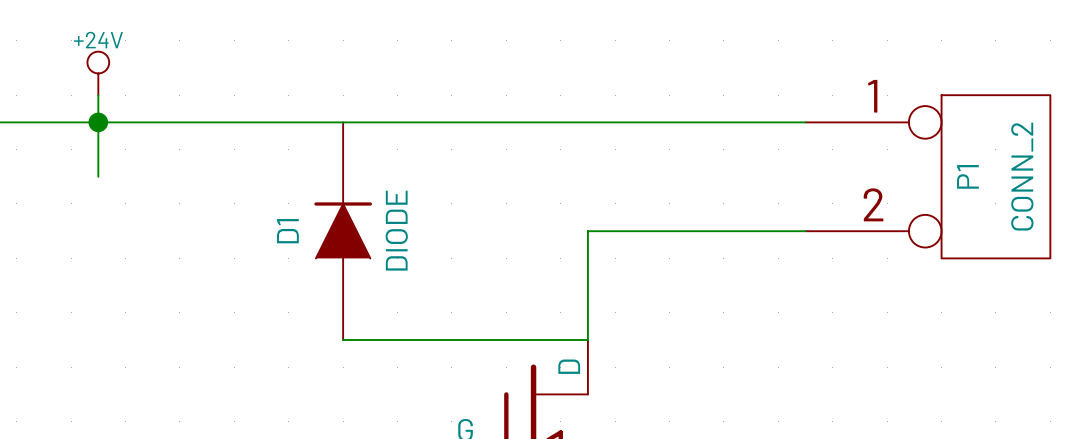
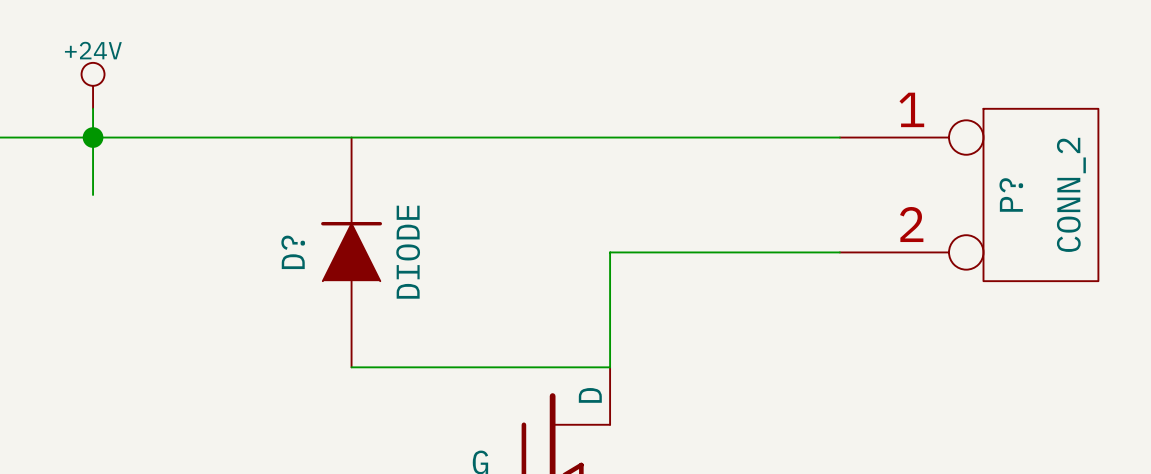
P1 name: P1 (967, 176) -> P? (1011, 194)
D1 name: D1 (287, 231) -> D? (293, 252)

